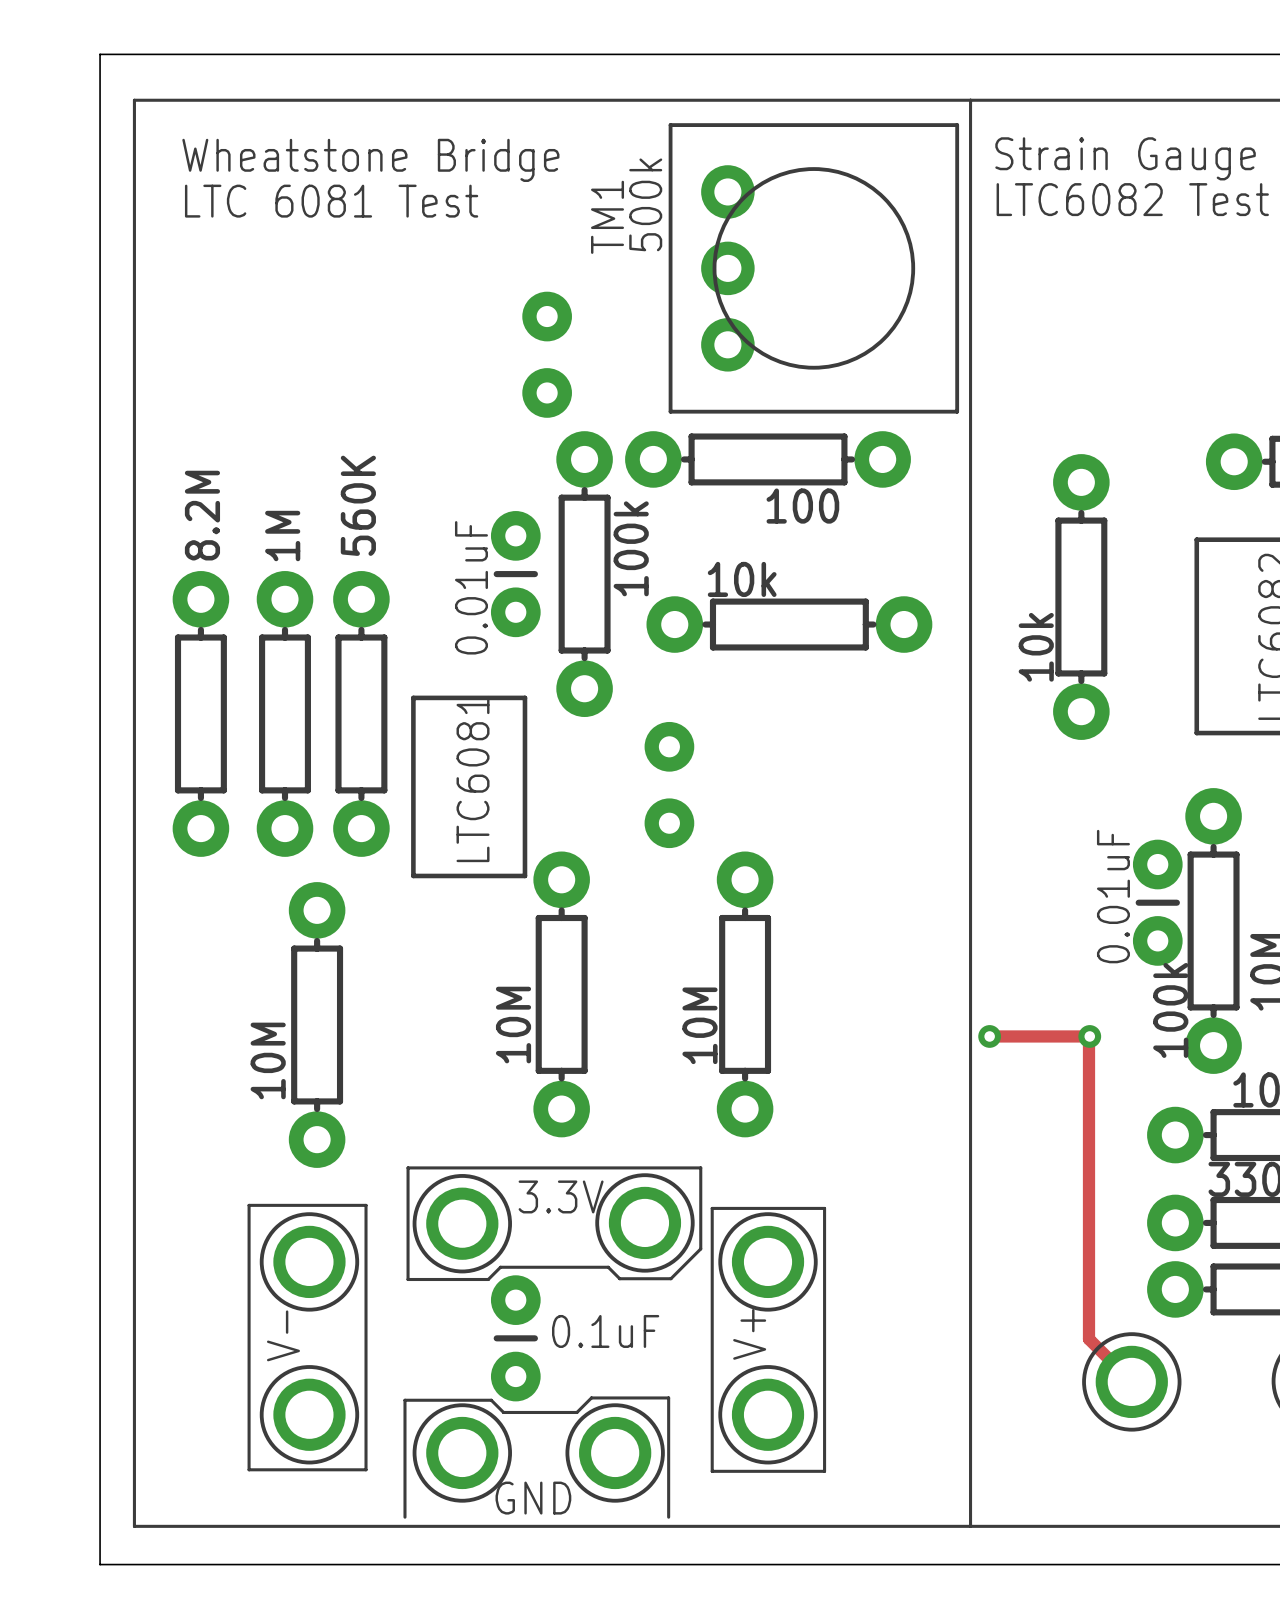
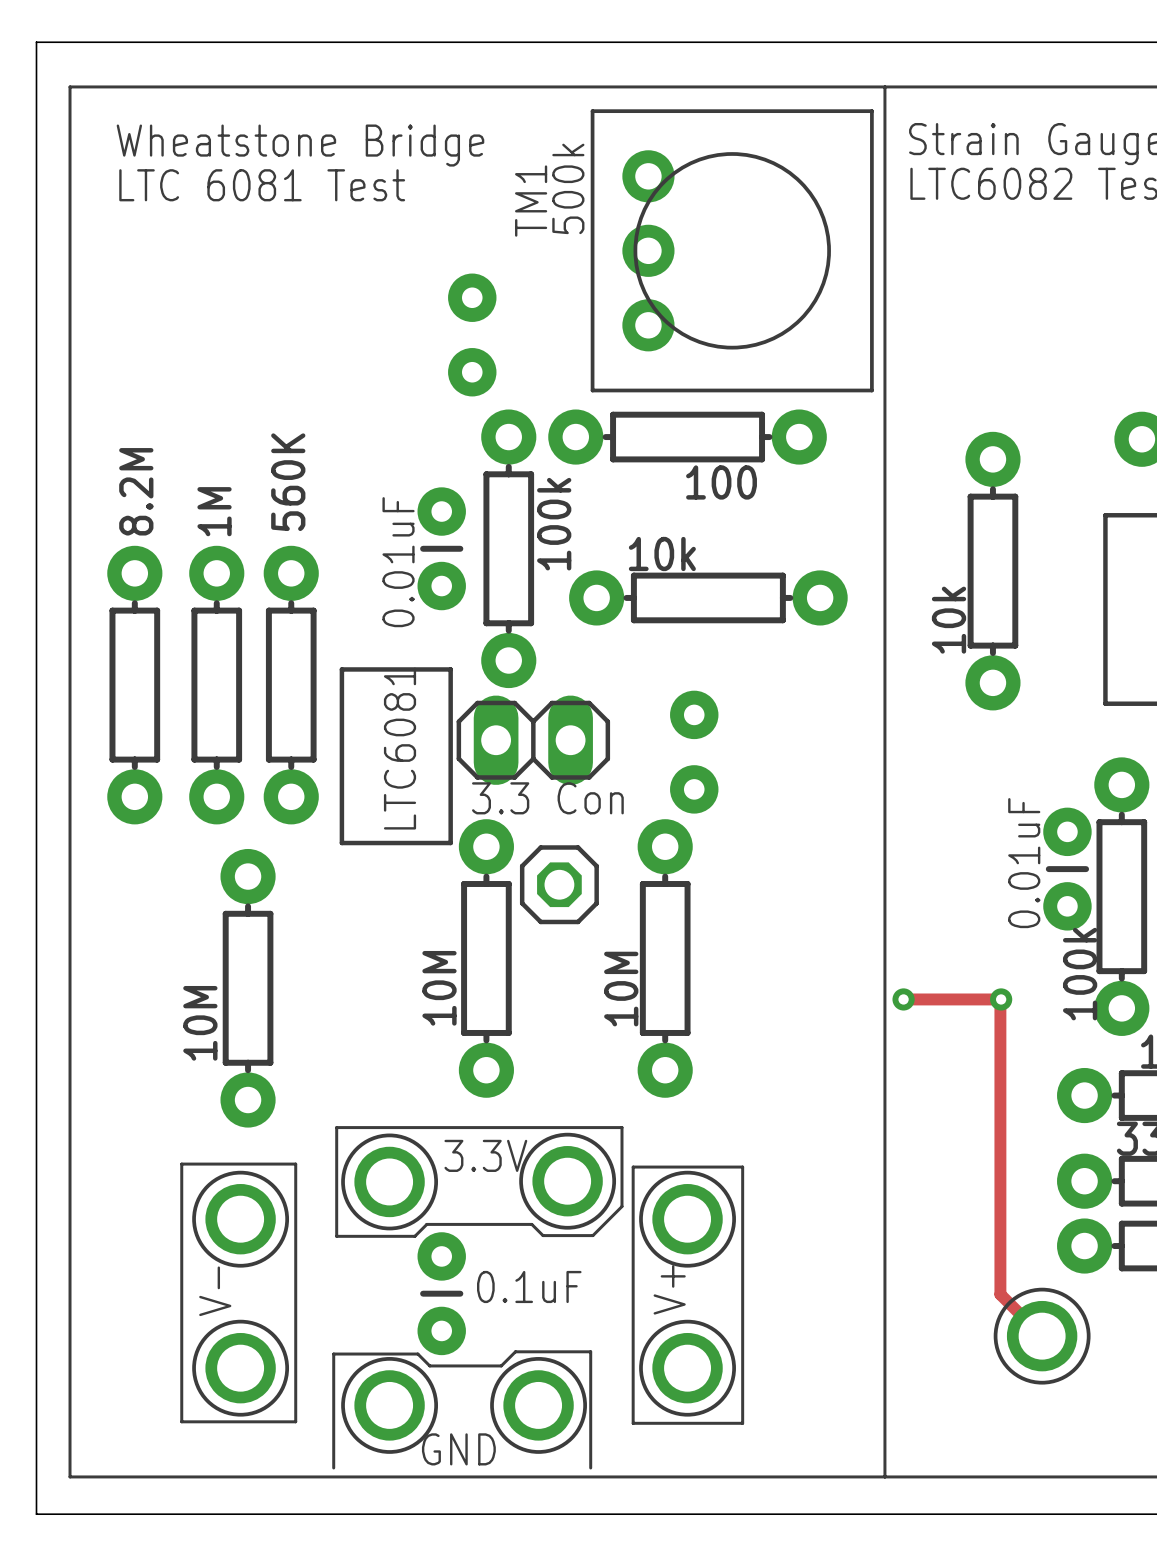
part: none -> (533, 740)
part position: (669, 785) -> (694, 752)
text: none -> 3.3 Con (547, 798)
part: none -> (559, 884)

